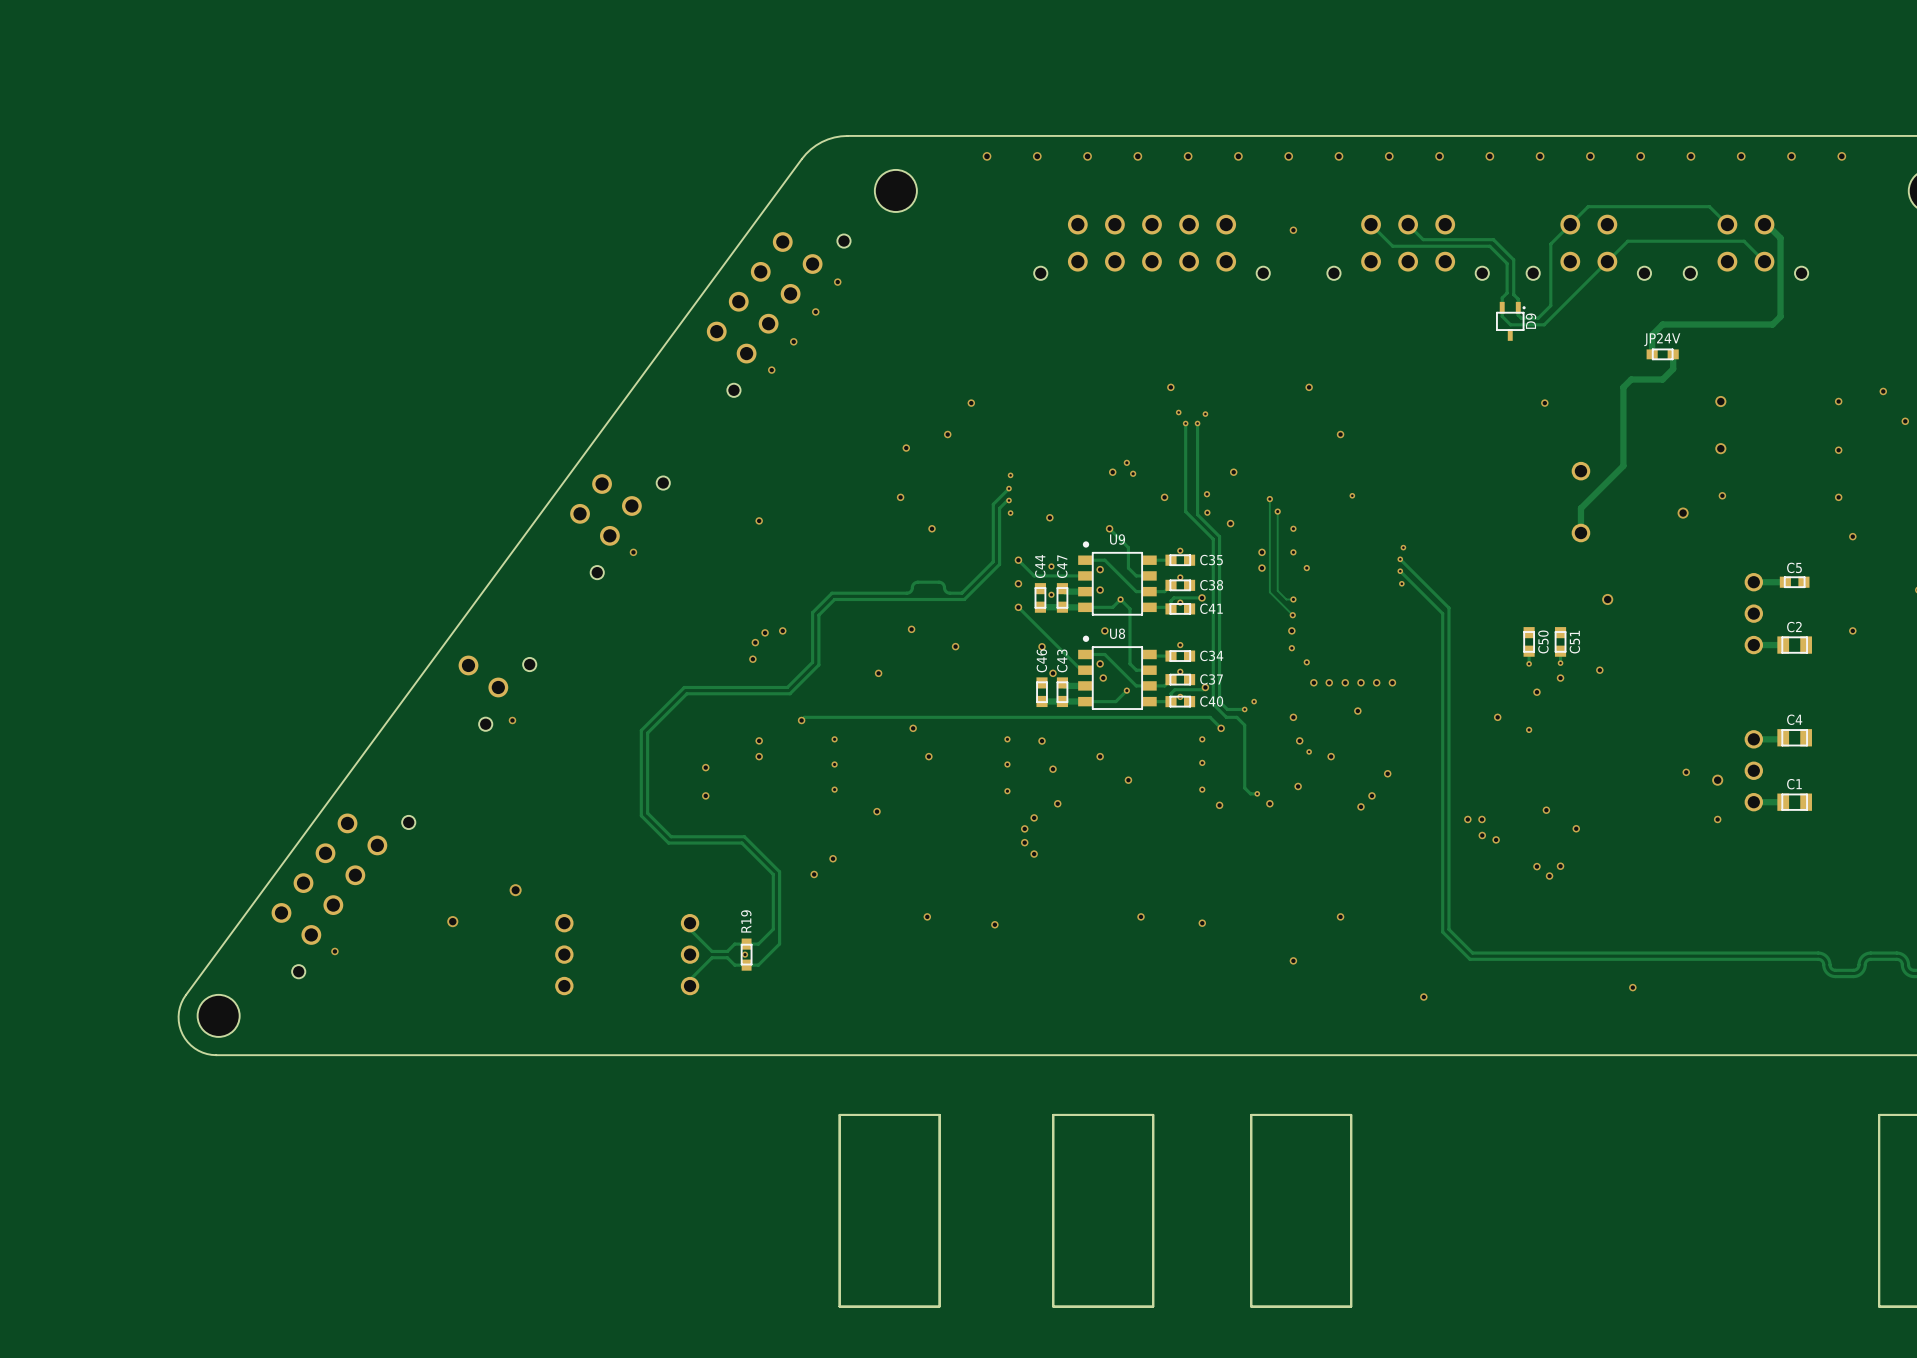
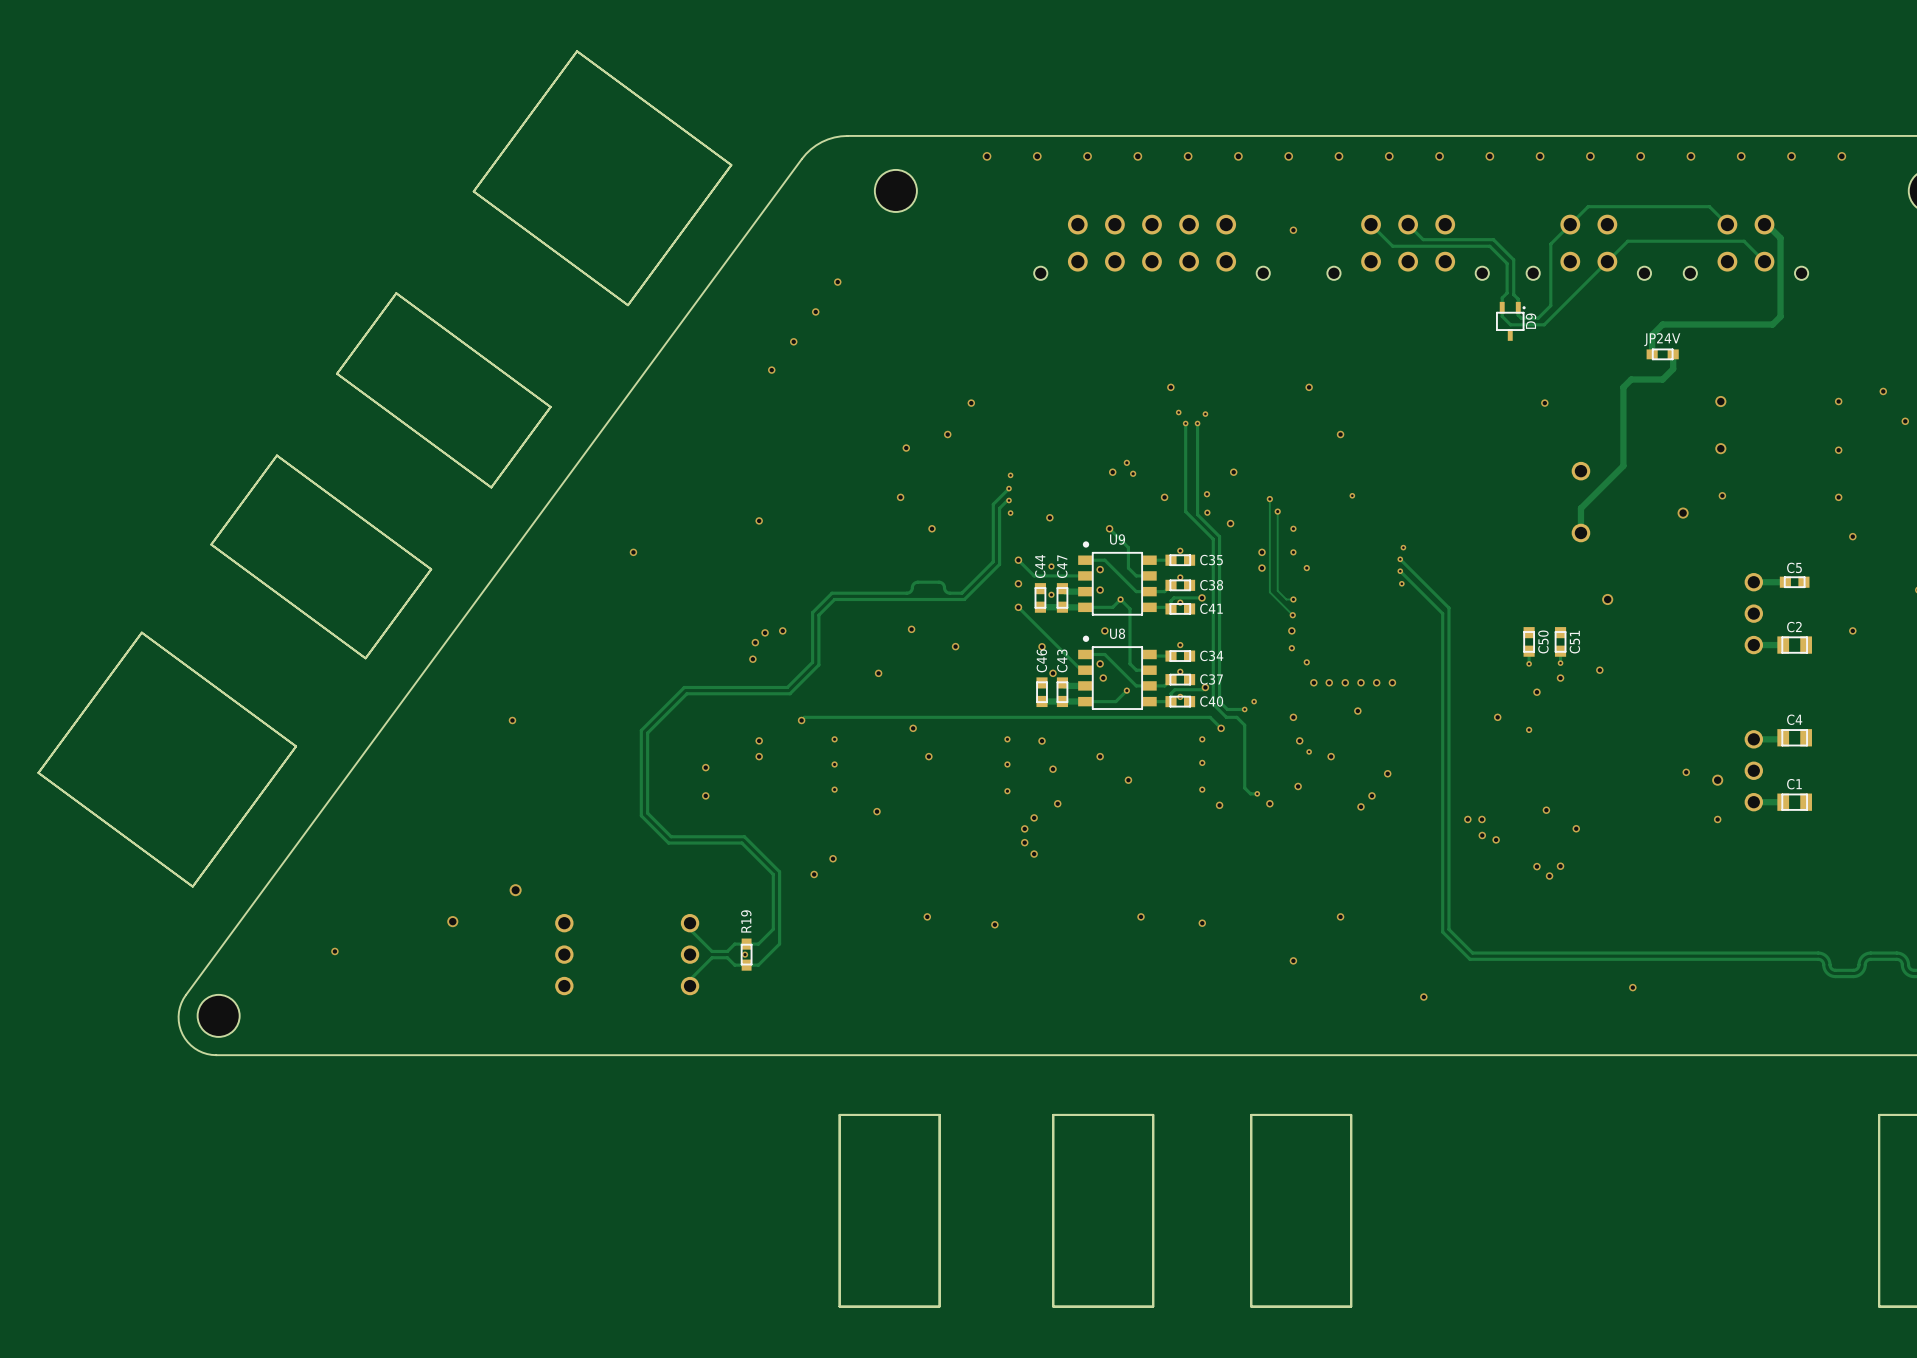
part: none -> (602, 178)
part: (778, 314) -> none
part: none -> (443, 390)
part: (620, 526) -> none
part: none -> (321, 556)
part: (497, 693) -> none
part: none -> (167, 759)
part: (343, 895) -> none

